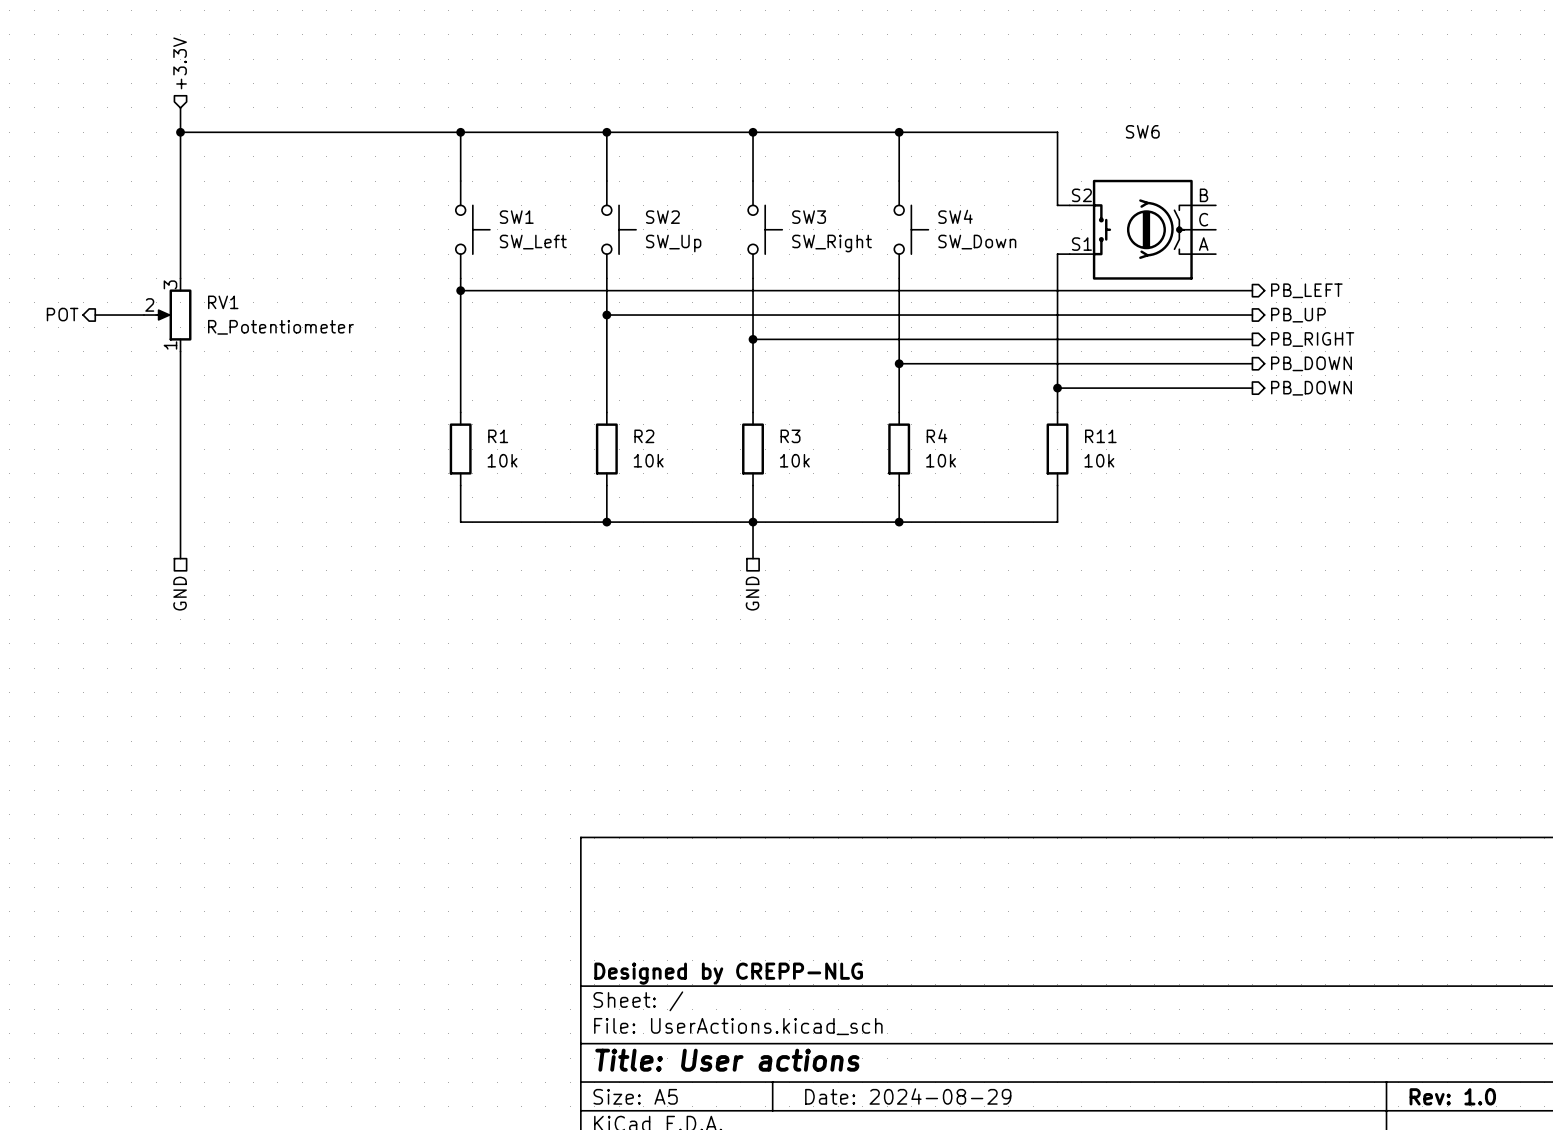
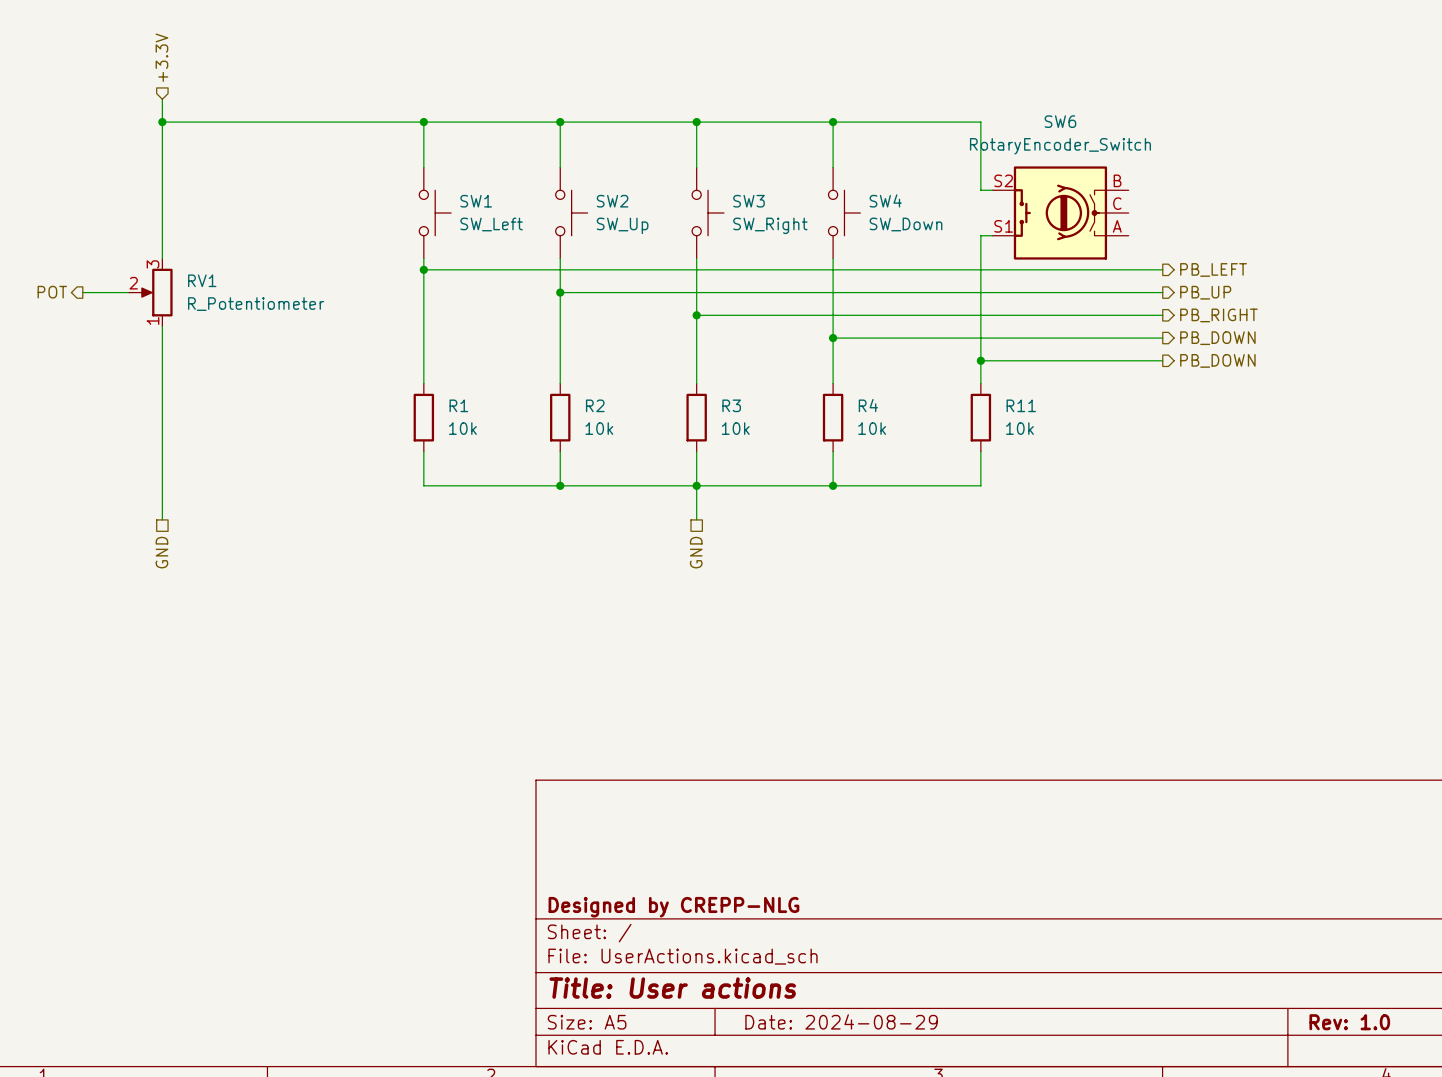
SW6 value: none -> RotaryEncoder_Switch (1060, 146)

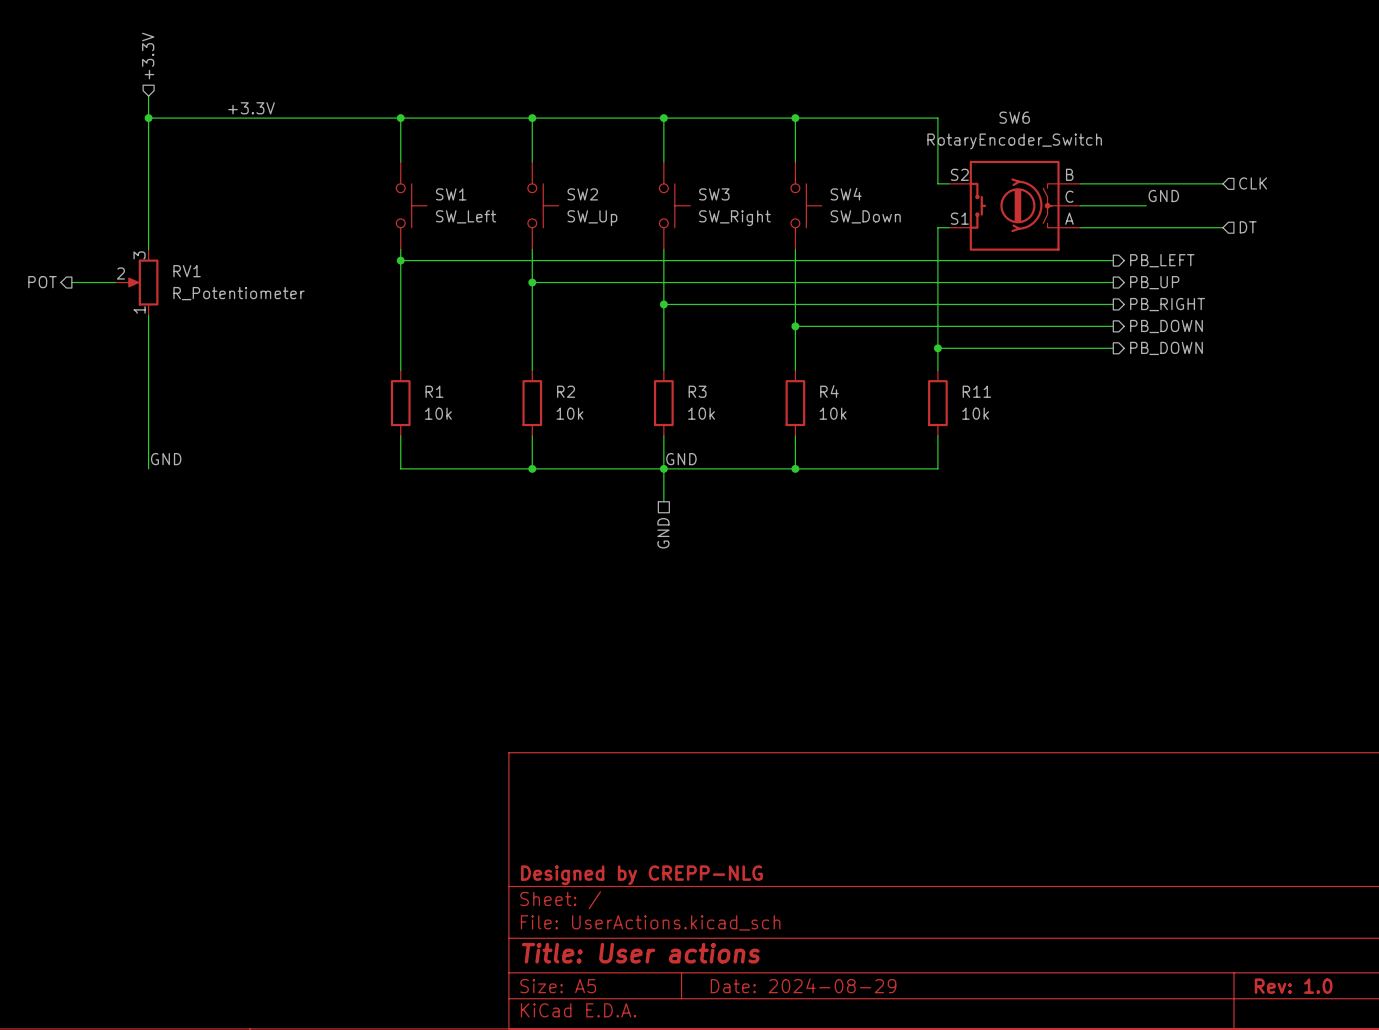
label: none -> +3.3V (251, 108)
hierarchical label: none -> CLK (1253, 183)
wire: none -> (1080, 183) (1222, 183)
label: none -> GND (1163, 196)
wire: none -> (1080, 205) (1146, 205)
wire: none -> (1080, 227) (1222, 227)
hierarchical label: none -> DT (1248, 227)
label: none -> GND (166, 459)
label: none -> GND (681, 459)
wire: (162, 485) (162, 519) -> none
hierarchical label: GND (161, 552) -> none

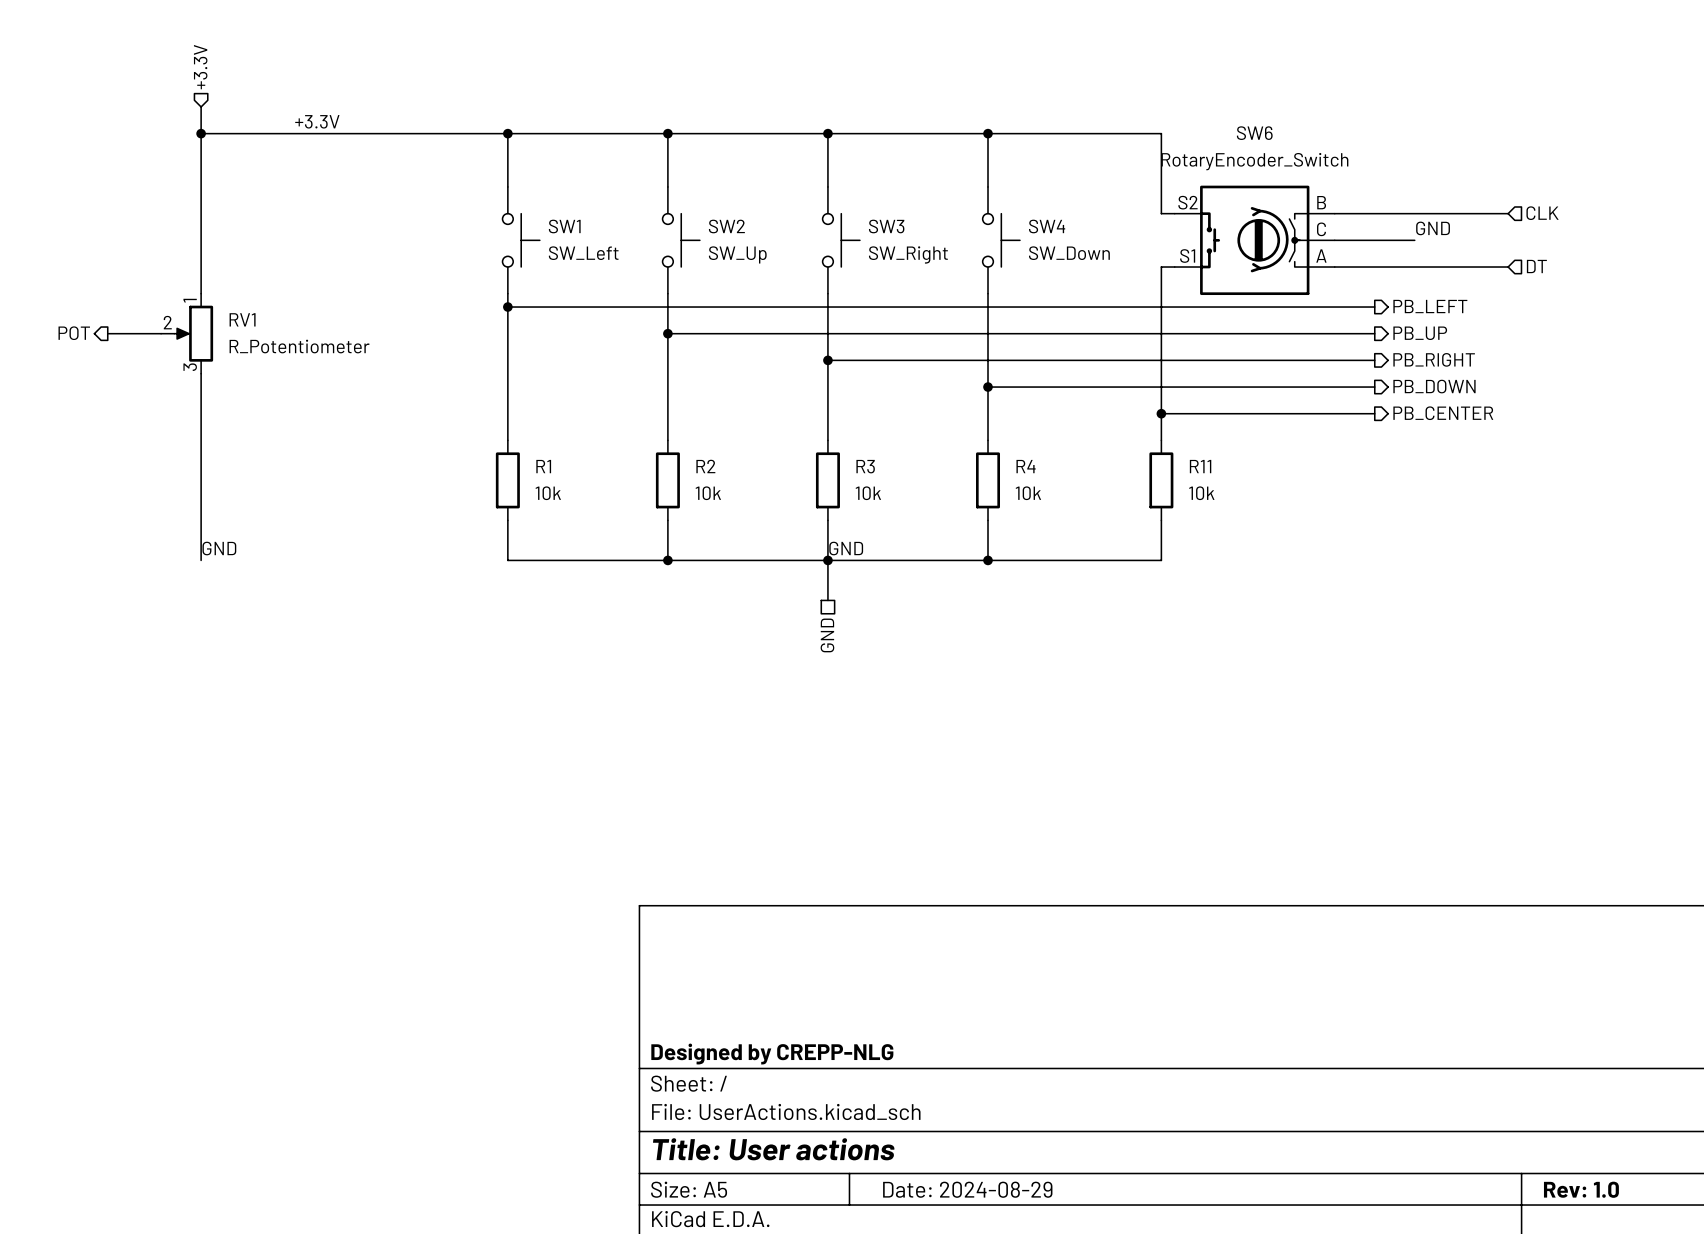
RV1 flip: as is (142, 282) -> up-down (193, 333)
hierarchical label: PB_DOWN (1166, 348) -> PB_CENTER (1443, 413)

